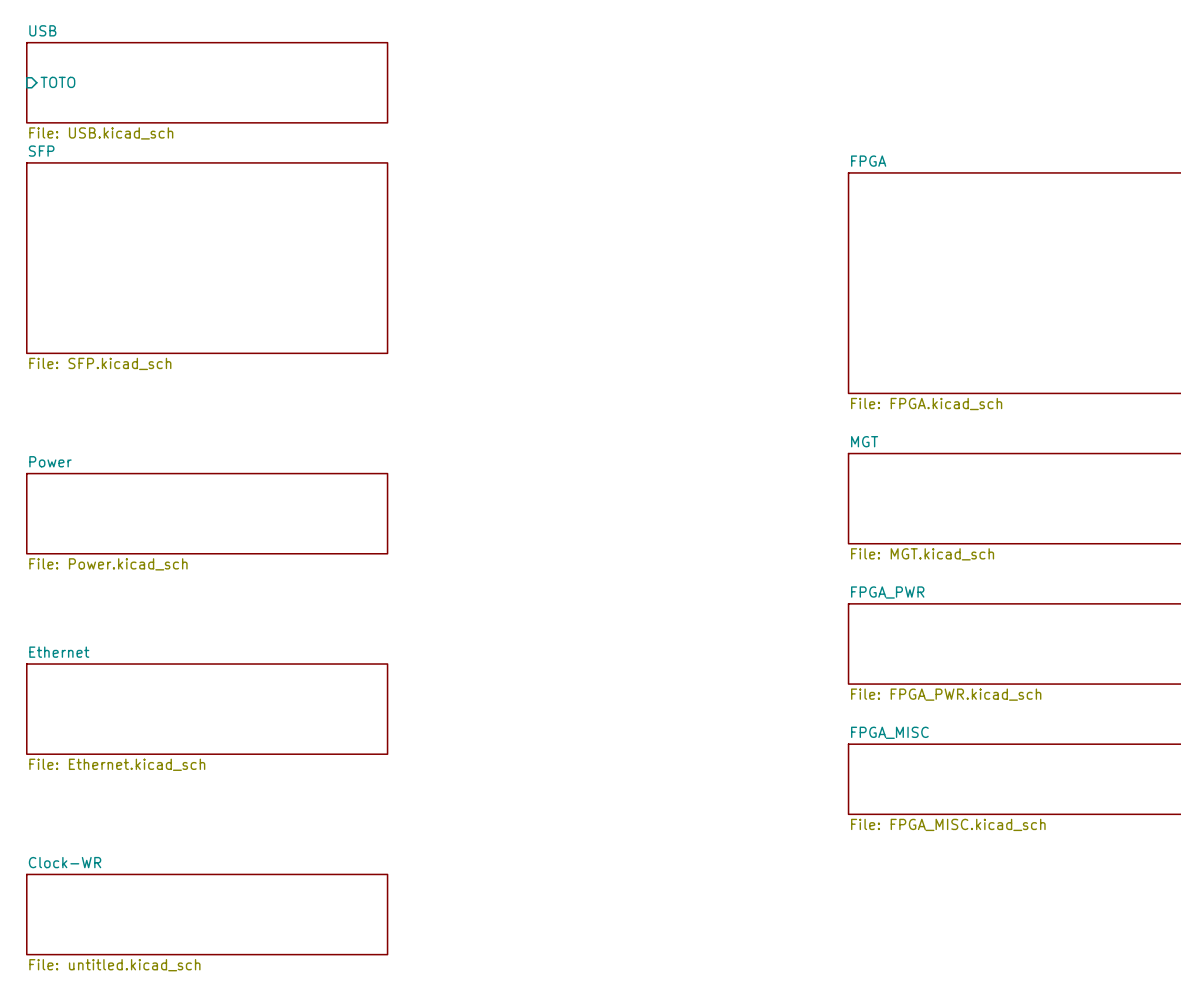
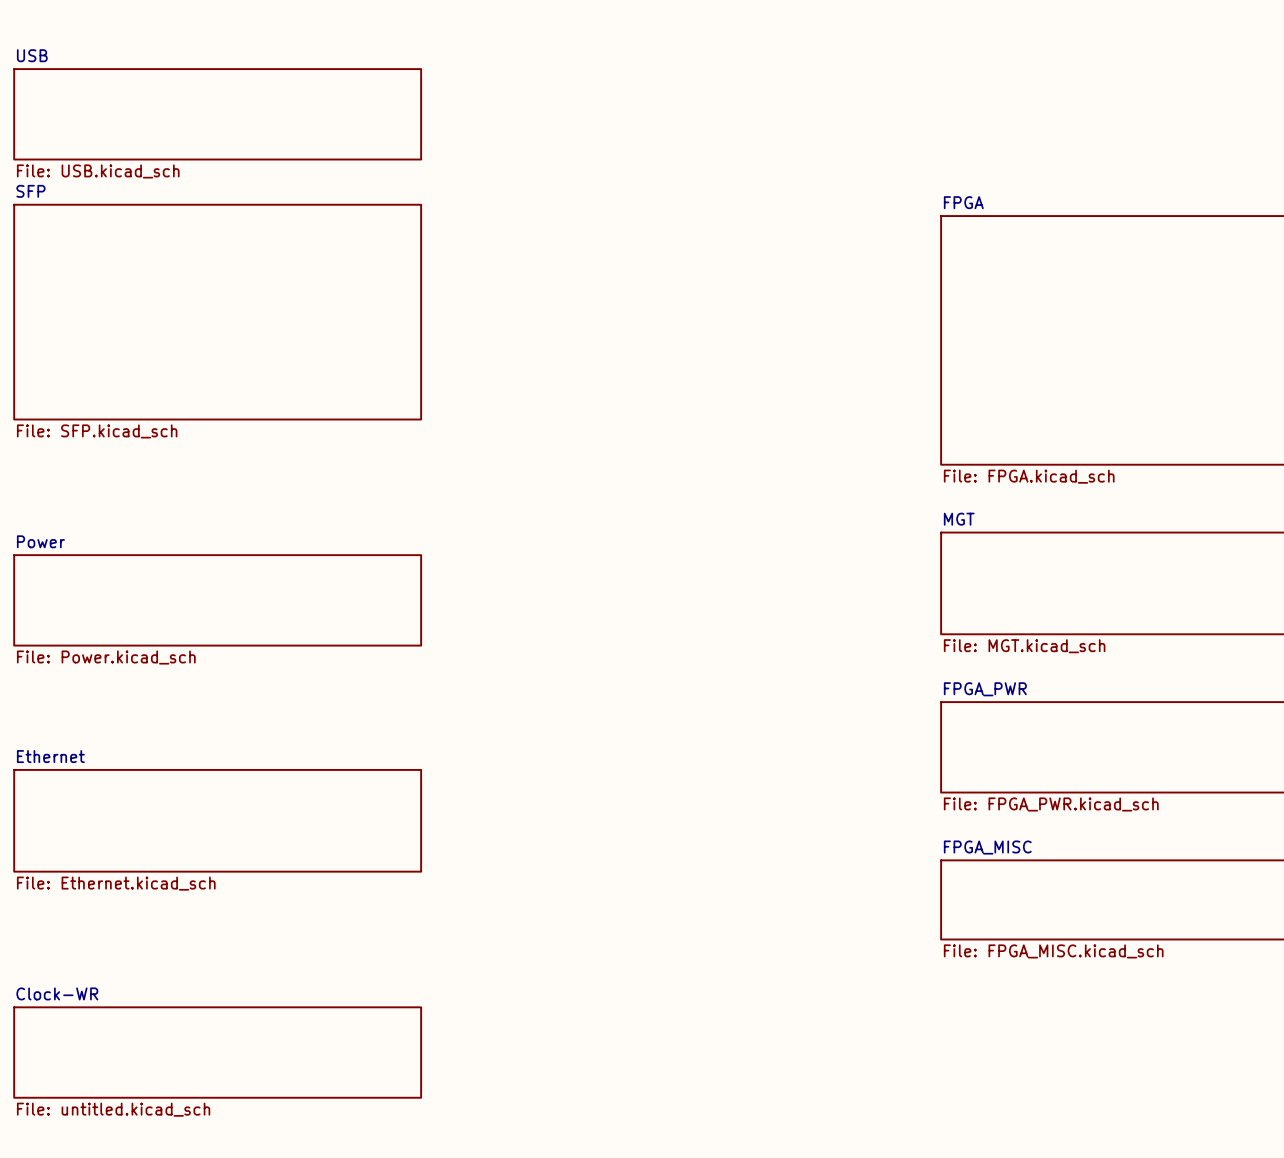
sheet pin: TOTO (57, 82) -> none

